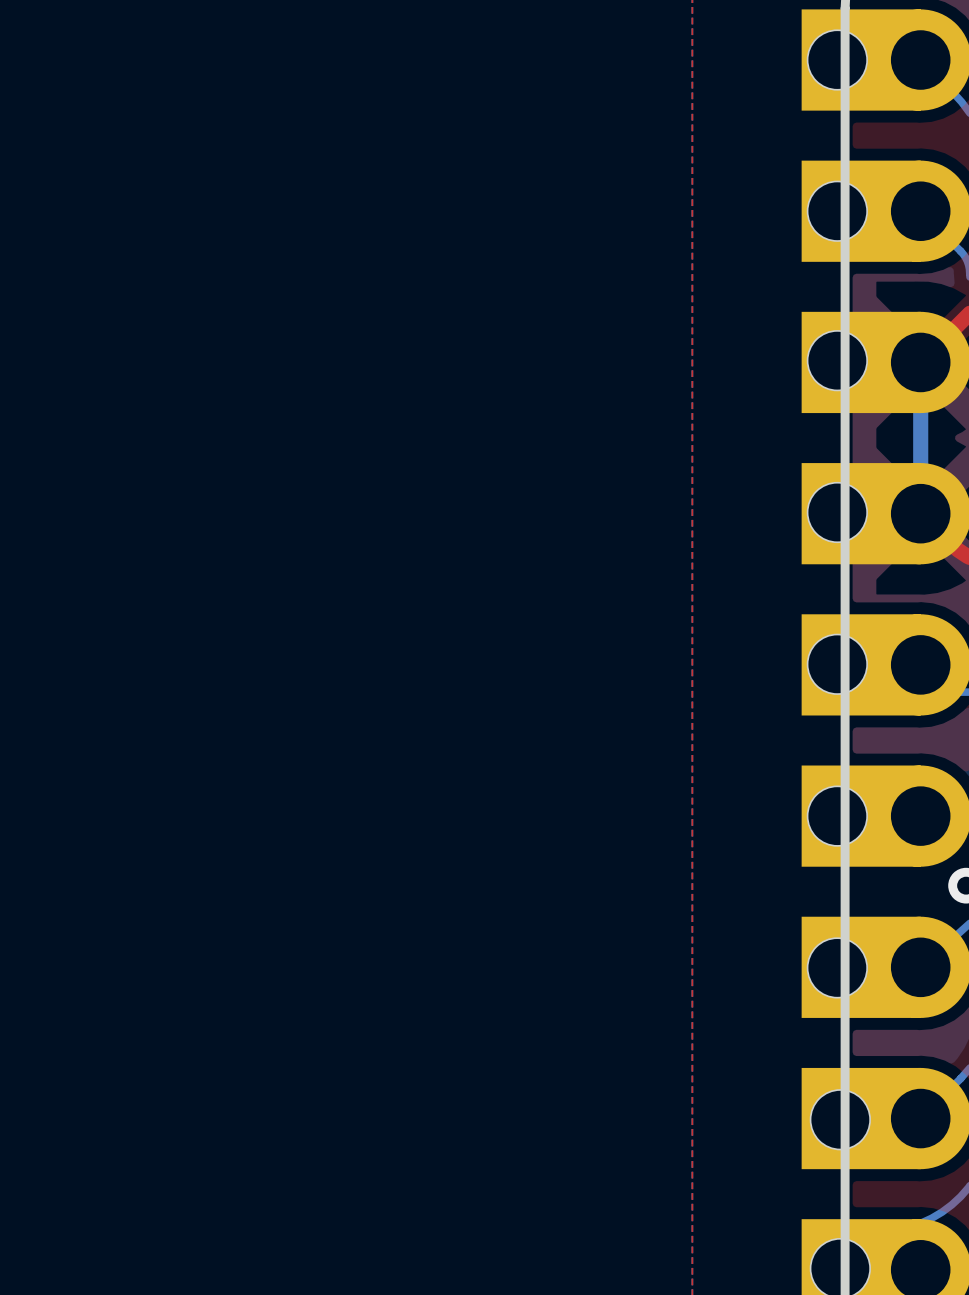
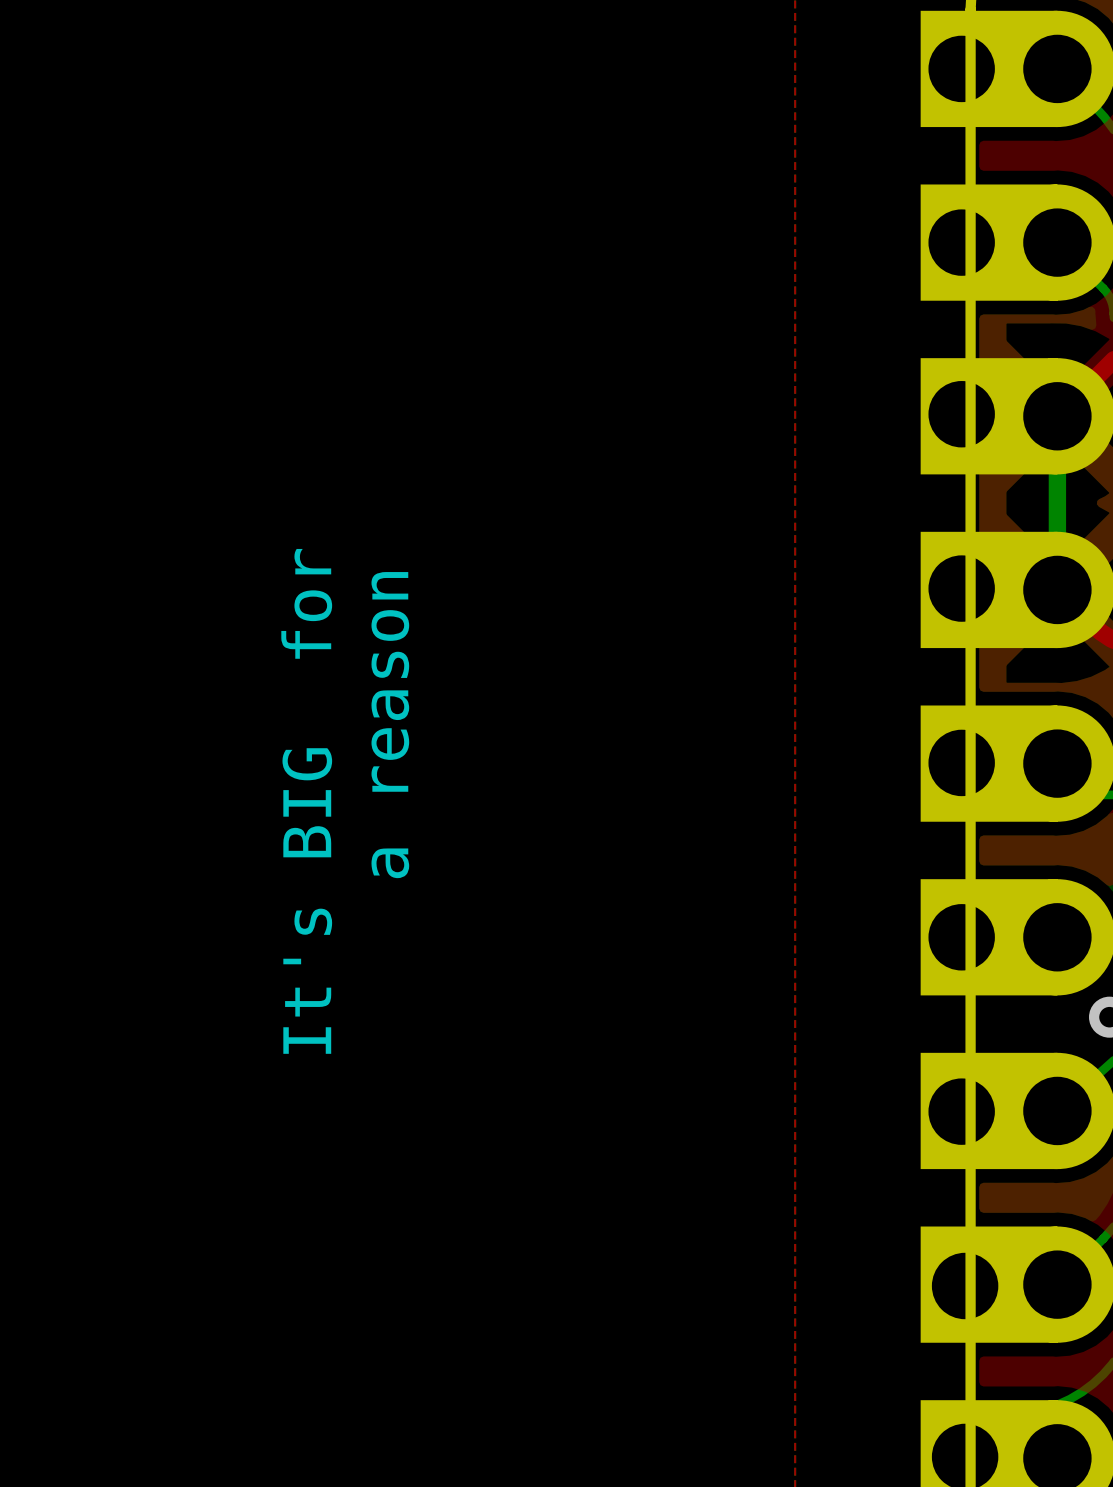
text: none -> a reason (390, 725)
text: none -> It's BIG for (306, 801)

